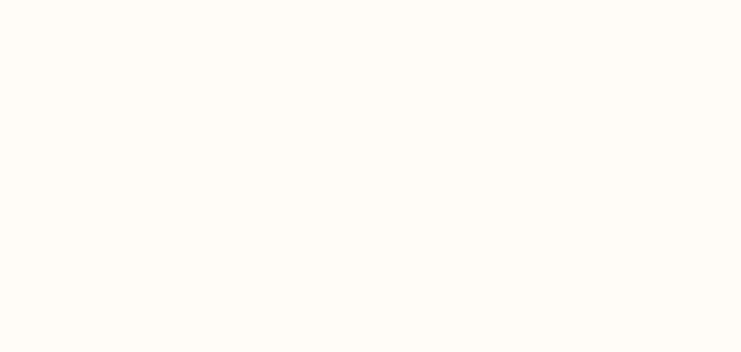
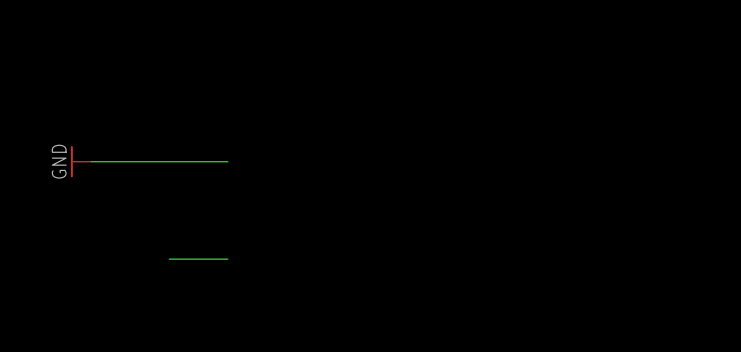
power symbol: none -> GND (81, 161)
wire: none -> (91, 161) (227, 161)
wire: none -> (169, 259) (227, 259)

